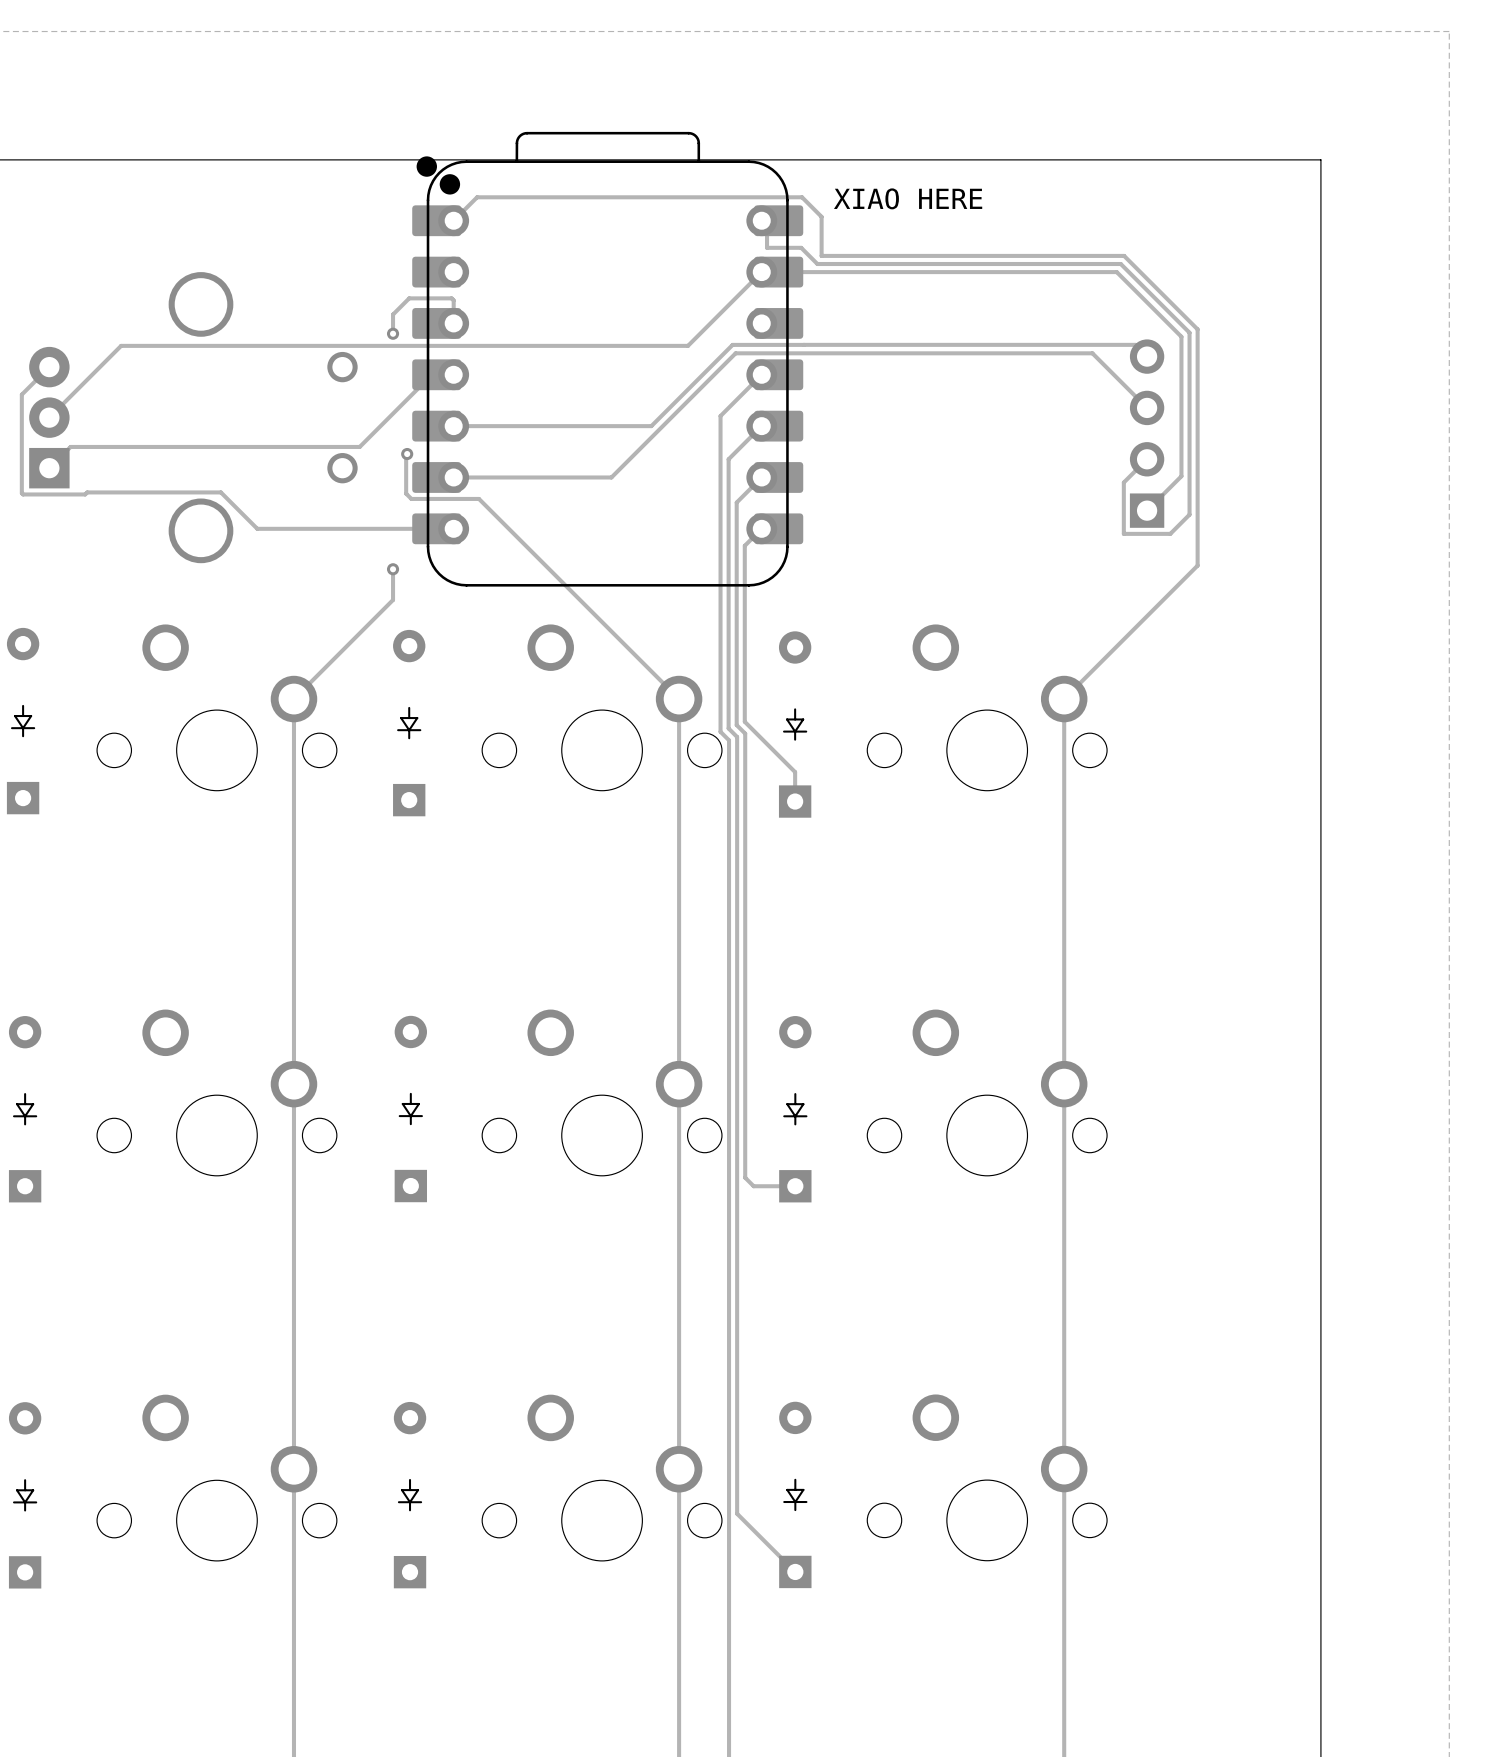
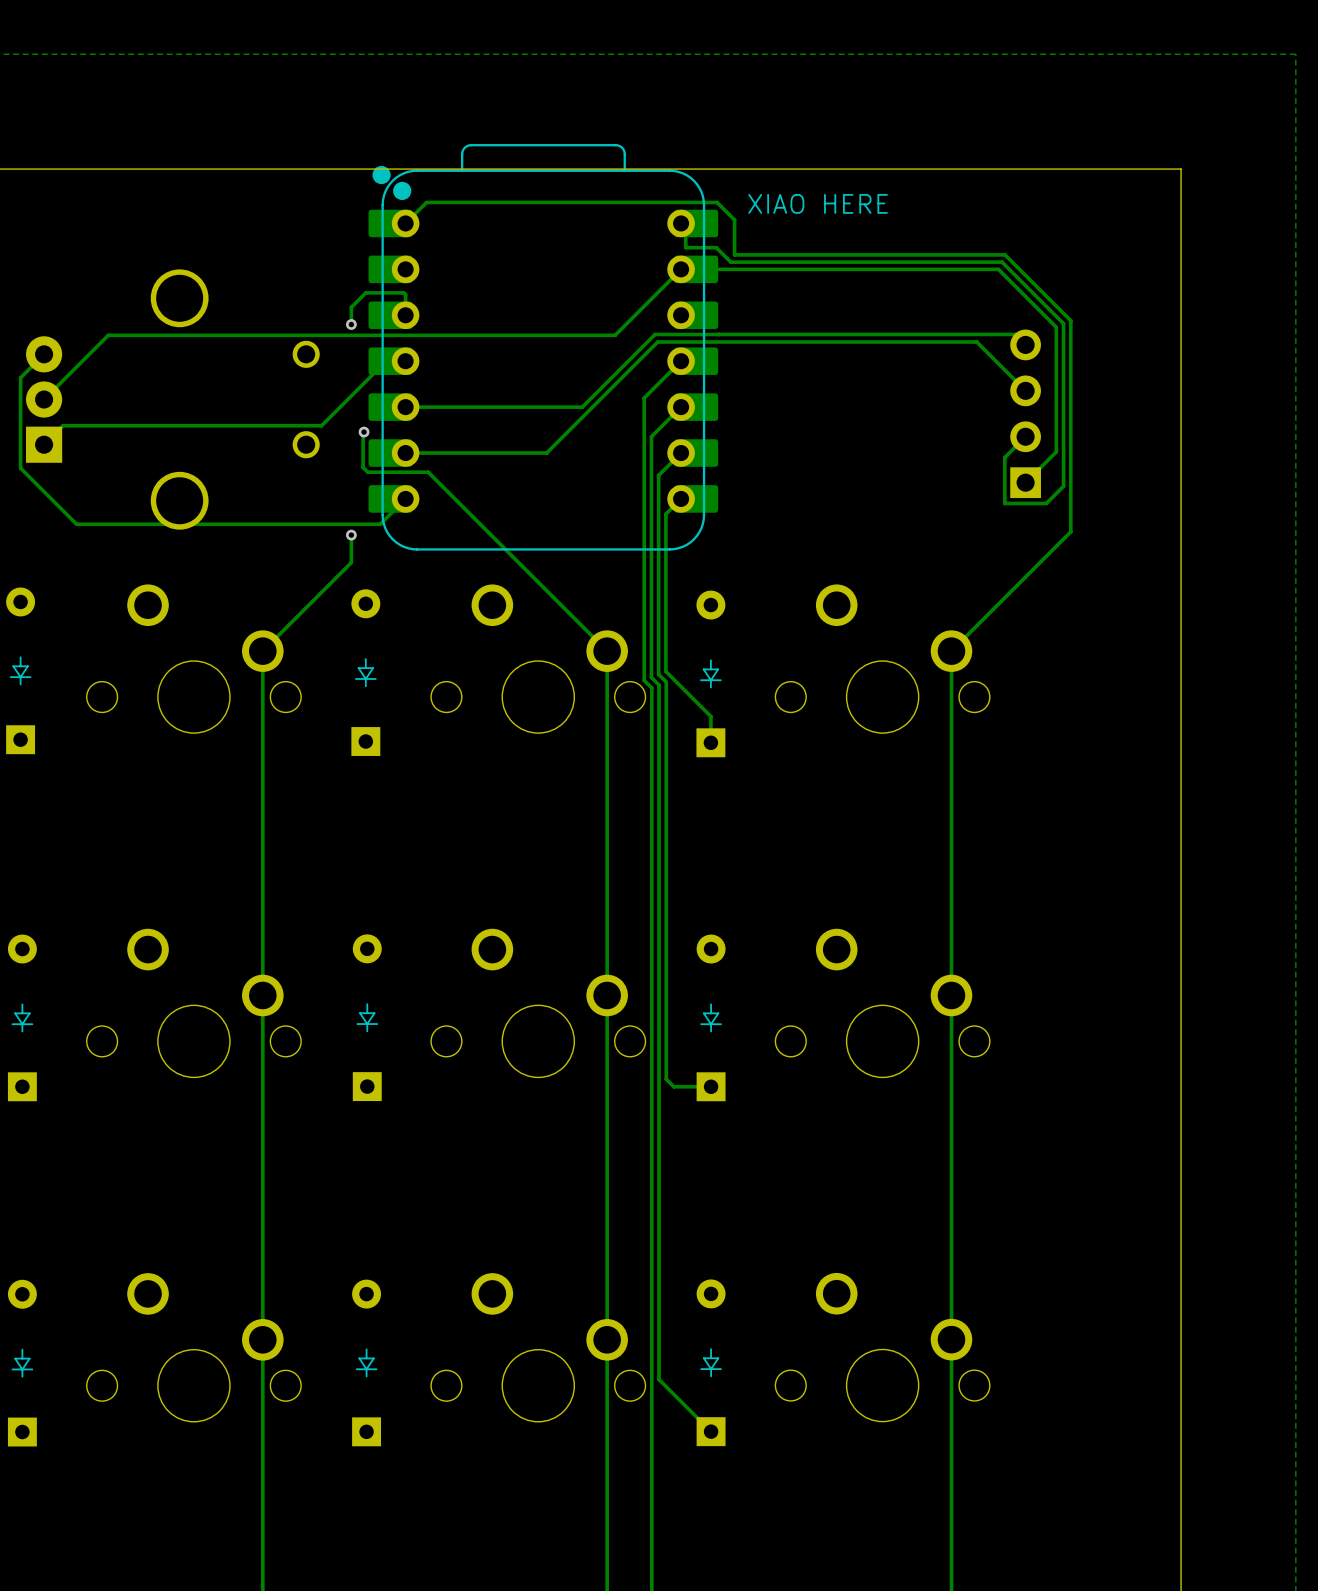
track: (23, 393) (23, 494) (220, 492) (257, 528) (453, 528) -> (20, 377) (20, 468) (76, 524) (380, 524) (405, 498)

